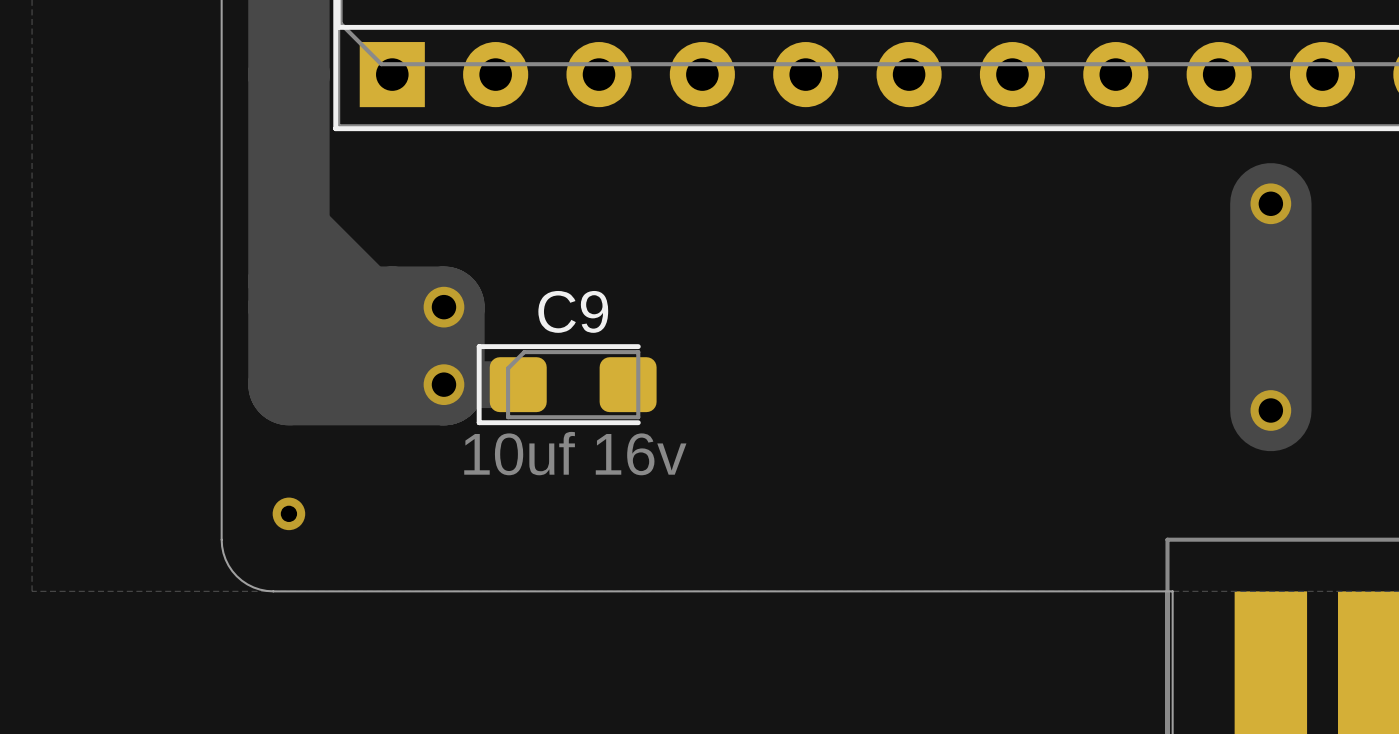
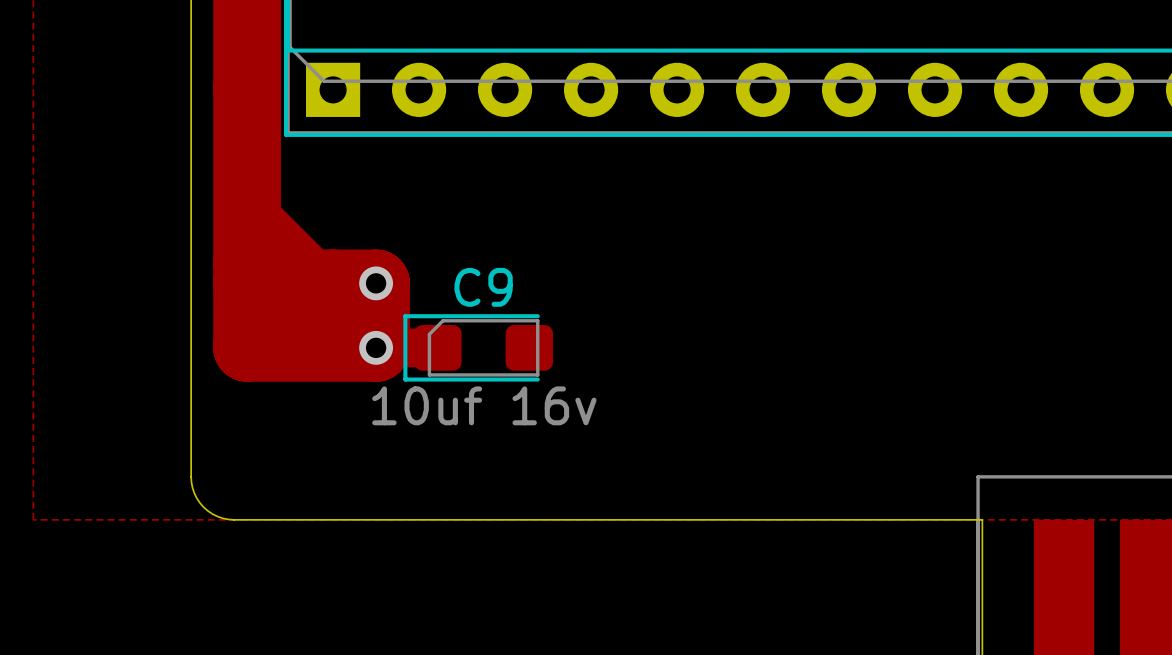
track: (1270, 203) (1270, 410) -> none
via: (1270, 203) -> none
via: (1270, 410) -> none
via: (288, 513) -> none

